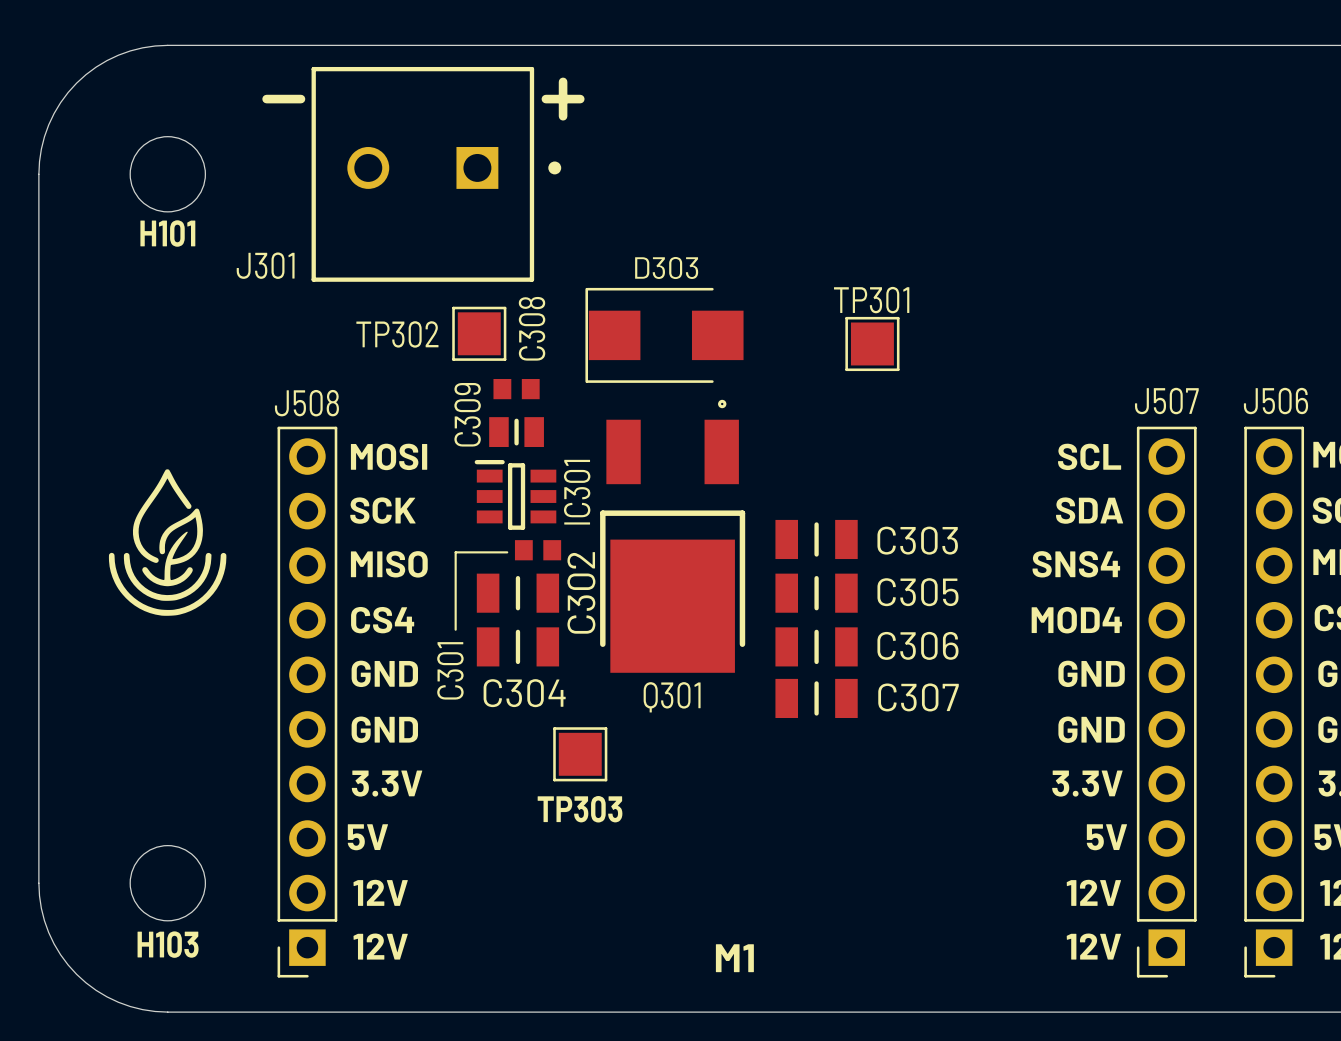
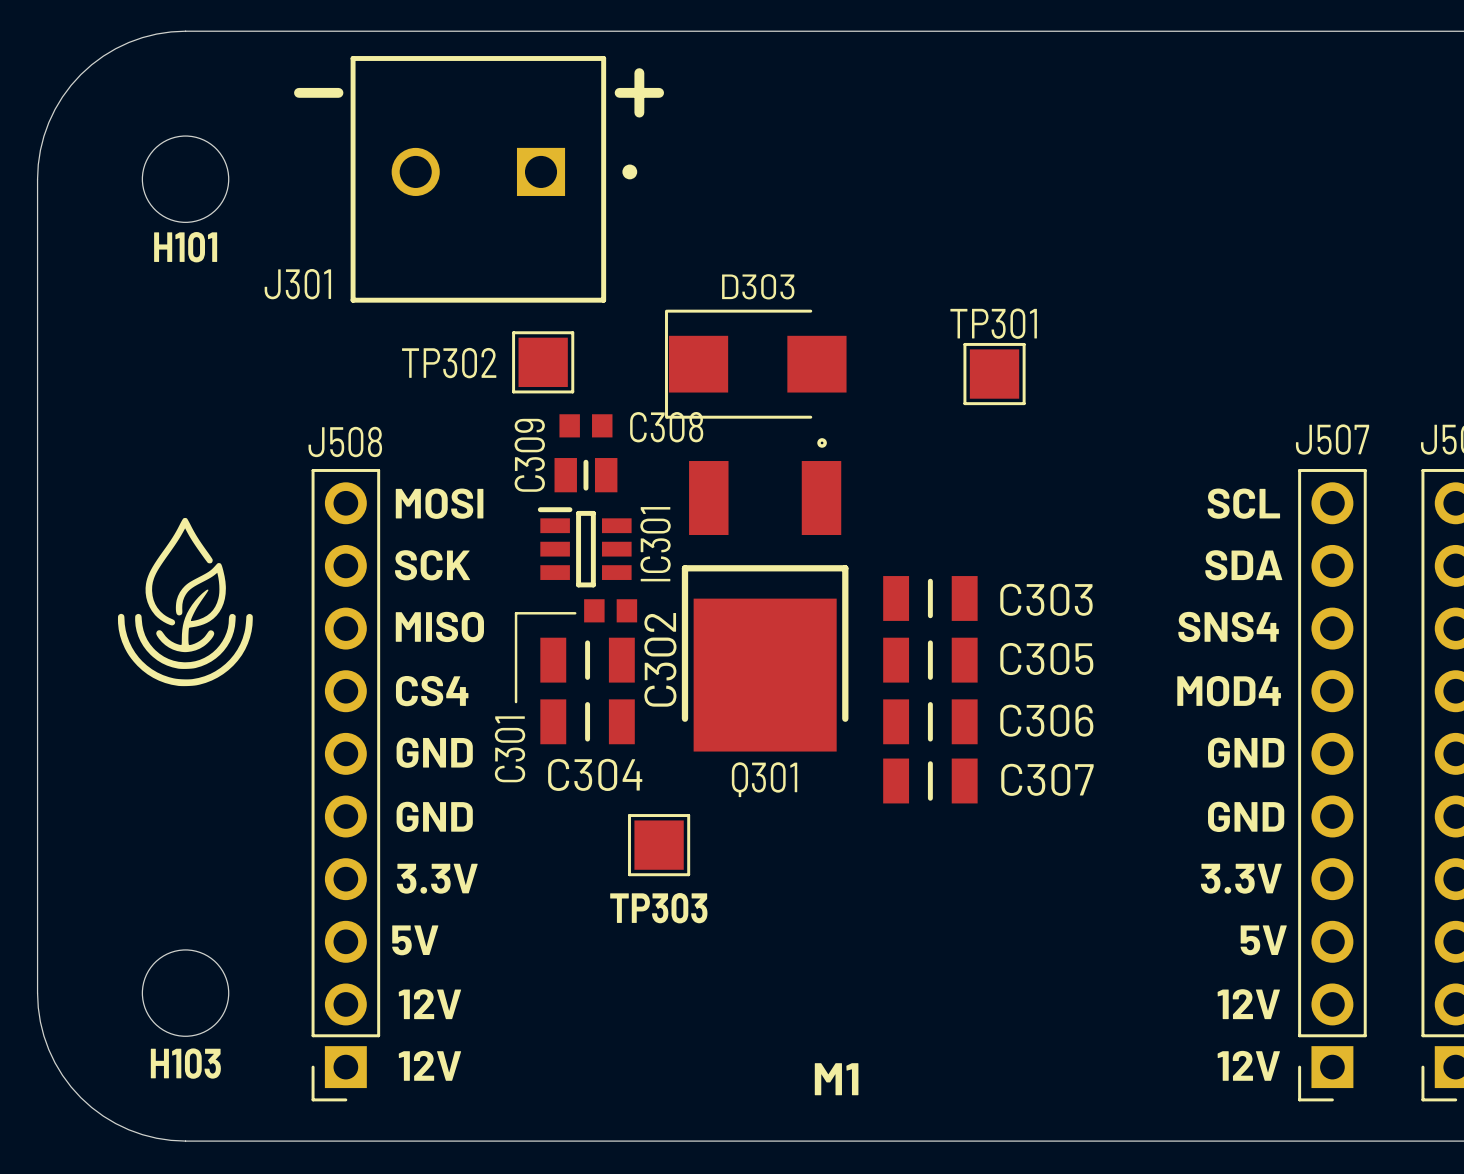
C308 name rotation: 0° (532, 328) -> 90° clockwise (666, 427)

